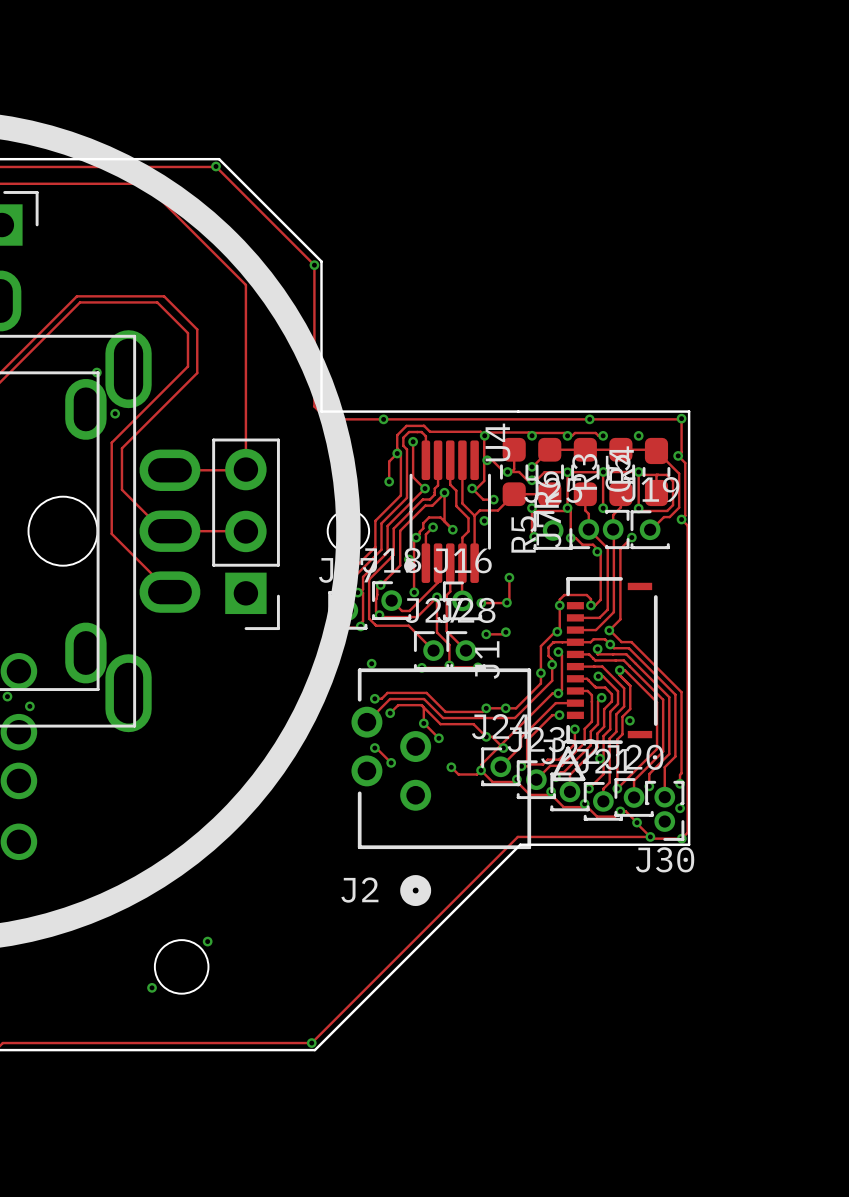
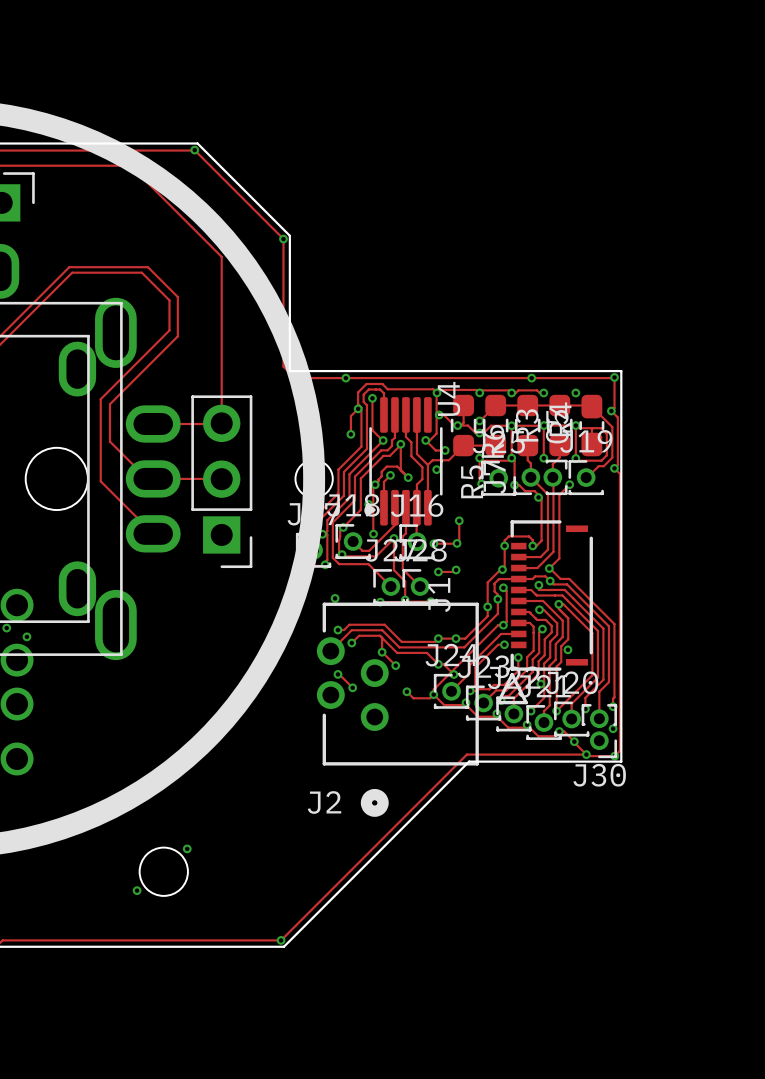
via: (96, 372) -> none
via: (115, 413) -> none

